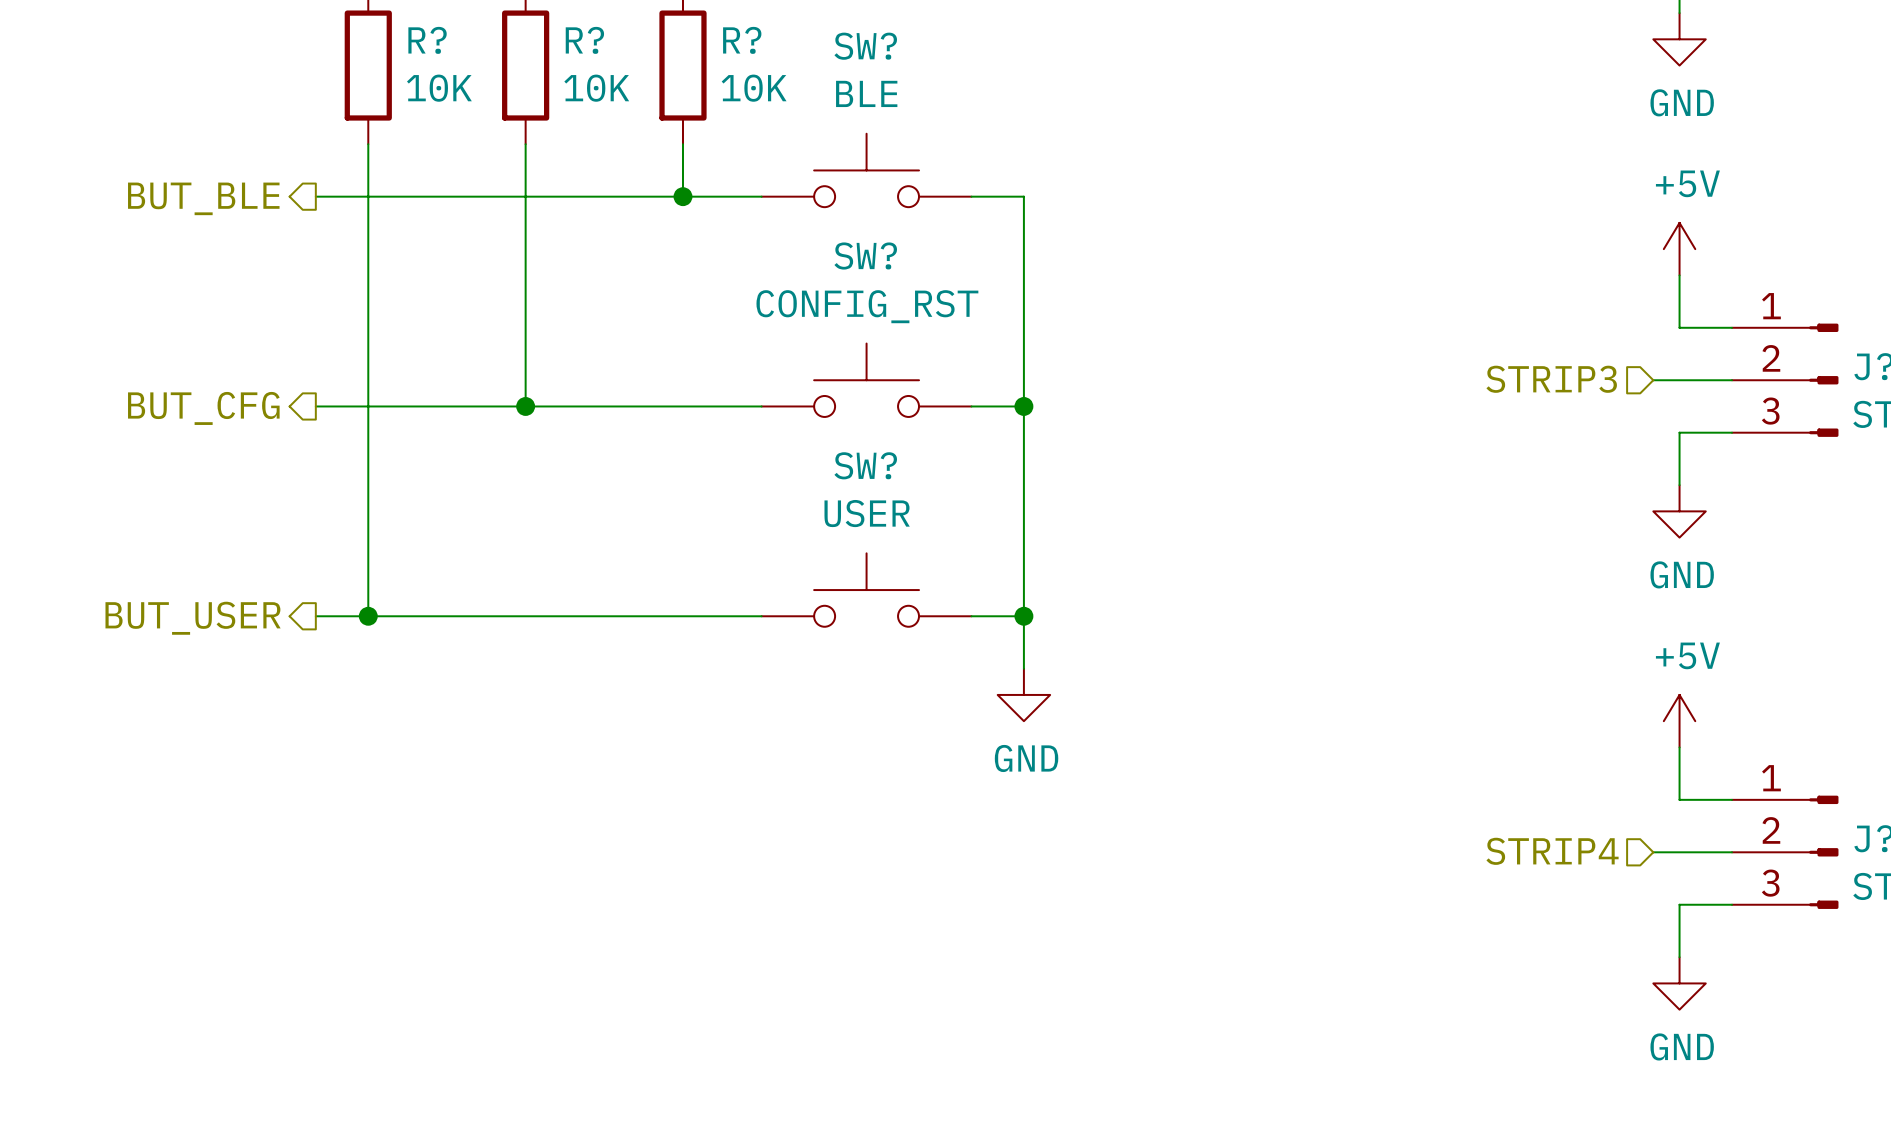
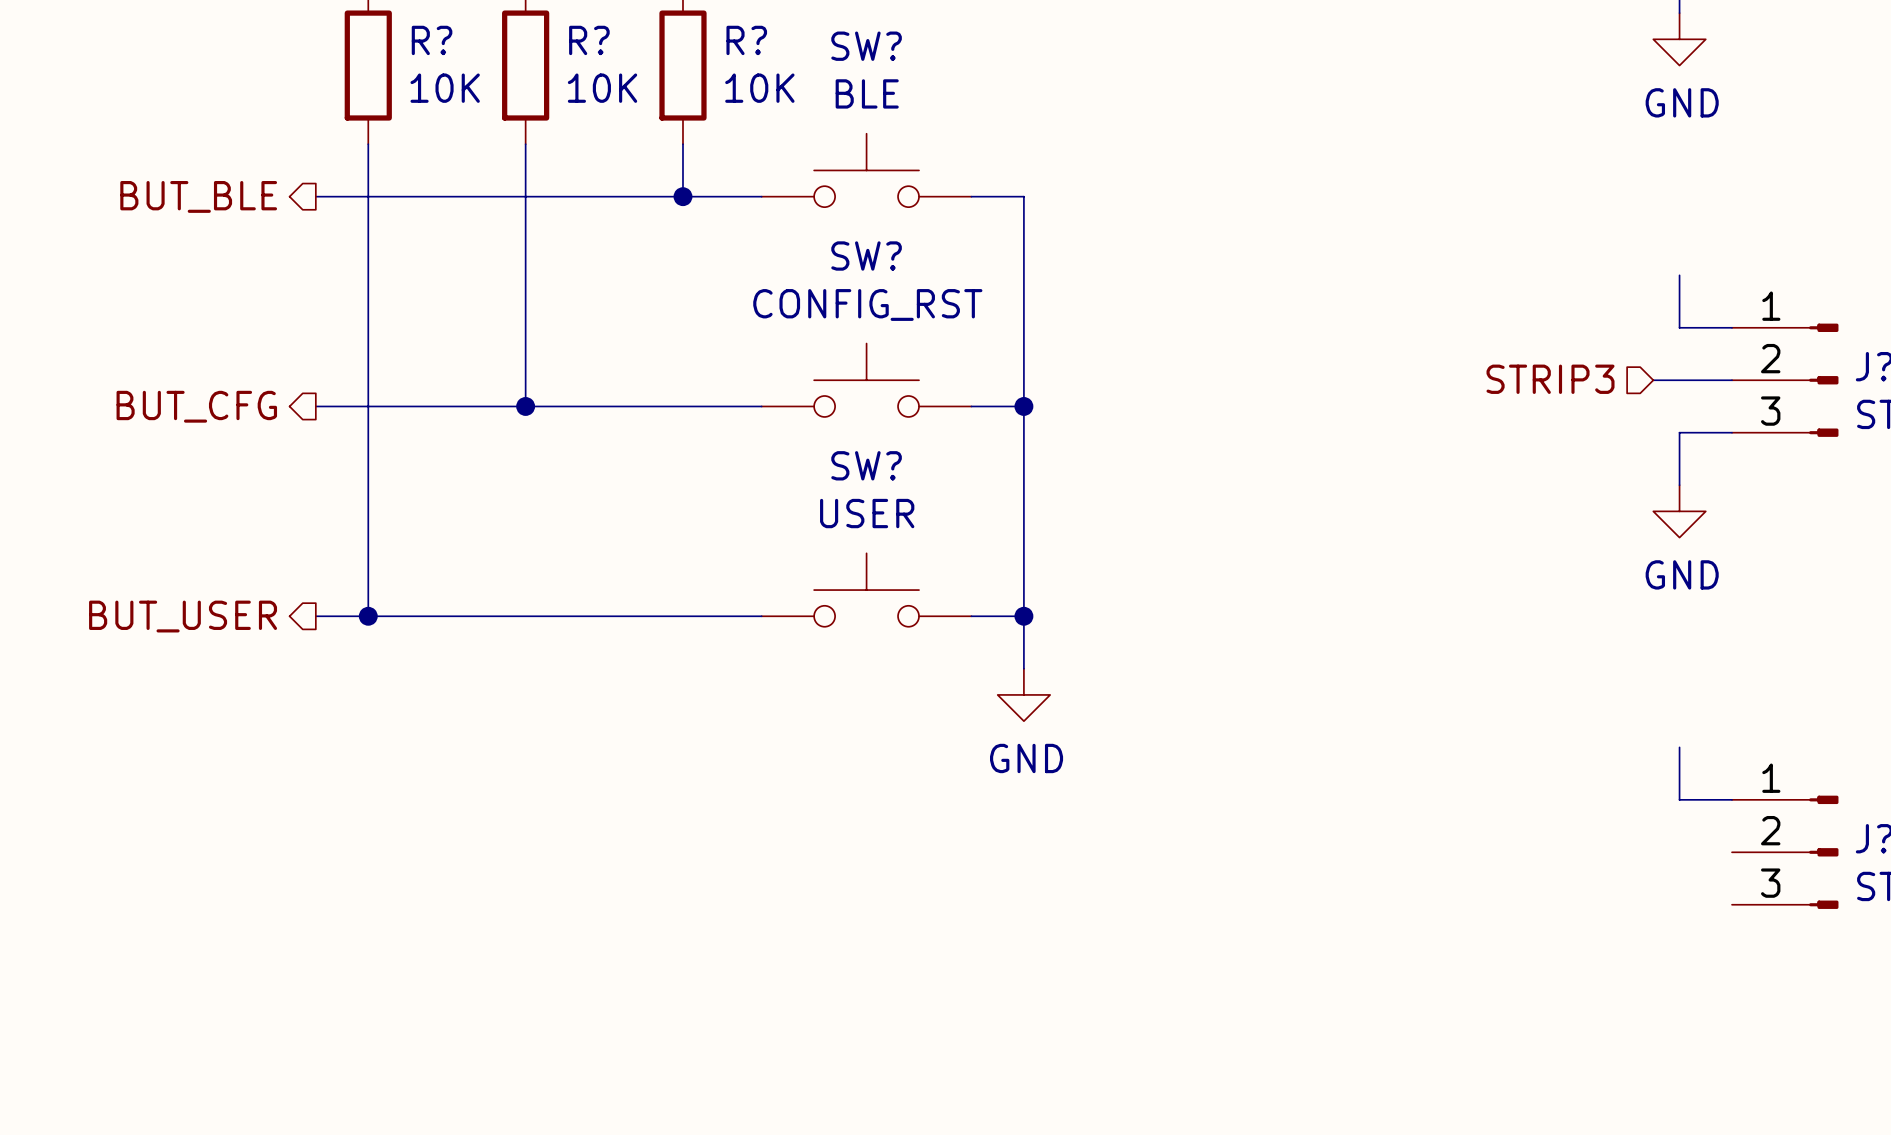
power symbol: +5V (1679, 249) -> none
power symbol: +5V (1679, 721) -> none
hierarchical label: STRIP4 (1552, 851) -> none
wire: (1653, 852) (1732, 852) -> none
wire: (1732, 904) (1679, 904) (1679, 957) -> none
power symbol: GND (1679, 983) -> none

